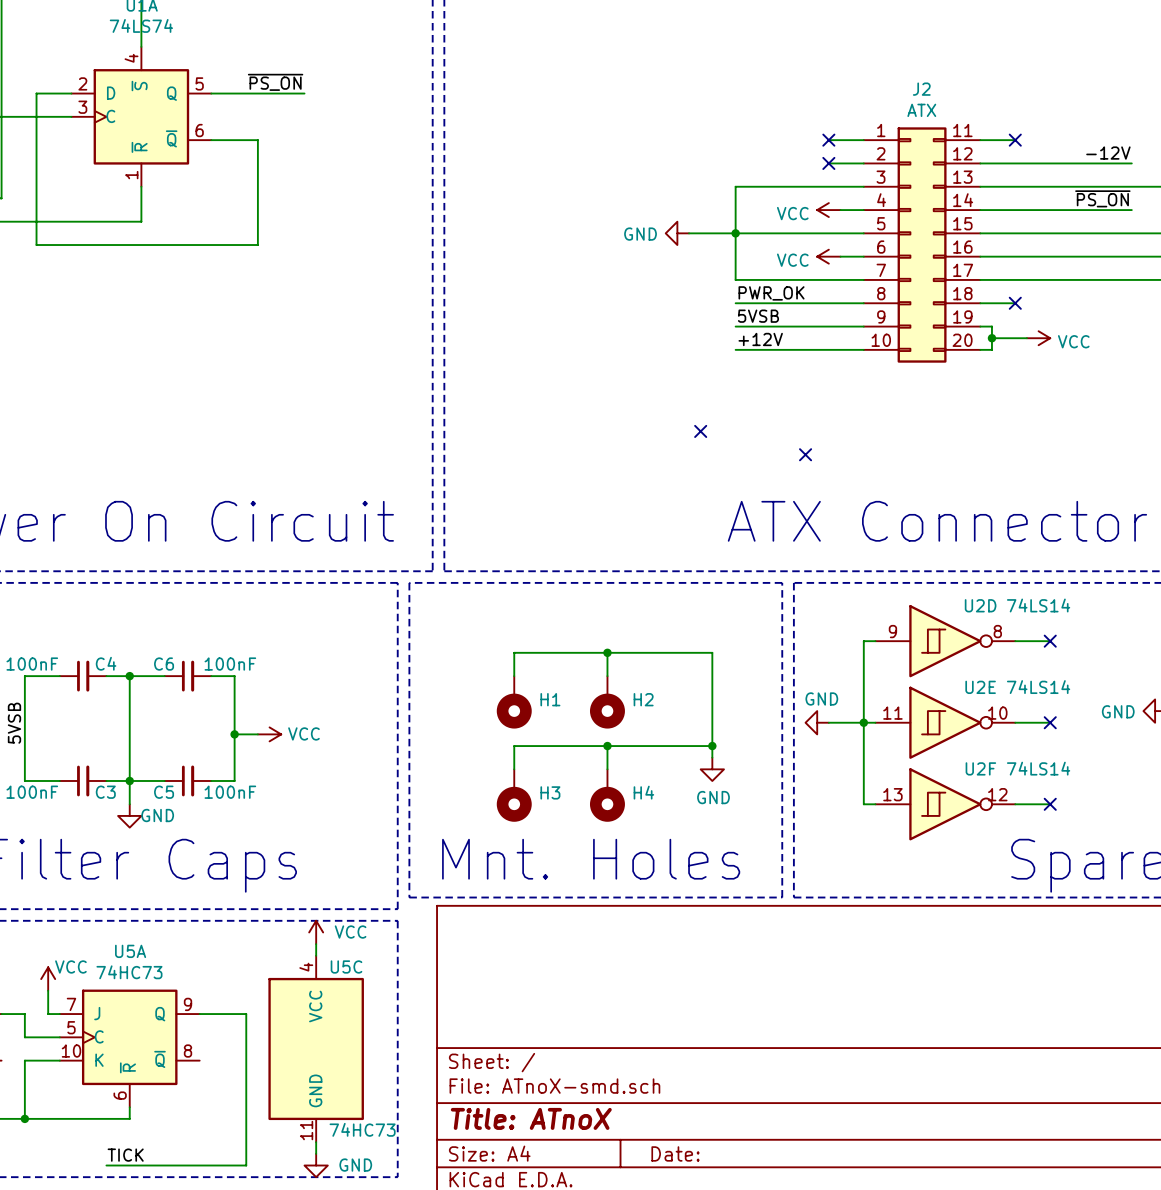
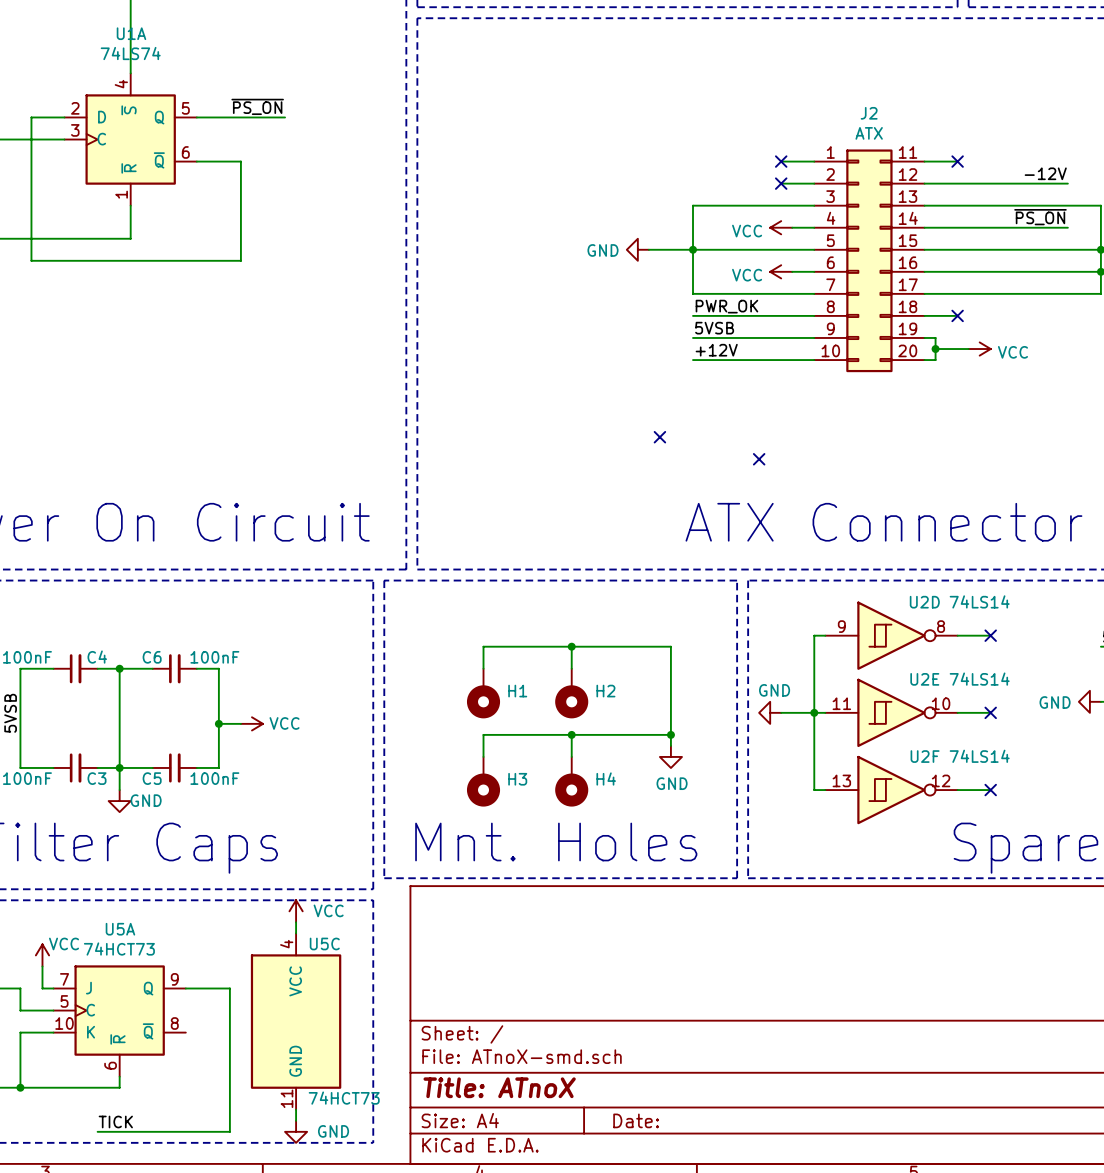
U5A value: 74HC73 (129, 972) -> 74HCT73 (119, 949)
U5C value: 74HC73 (362, 1129) -> 74HCT73 (344, 1098)

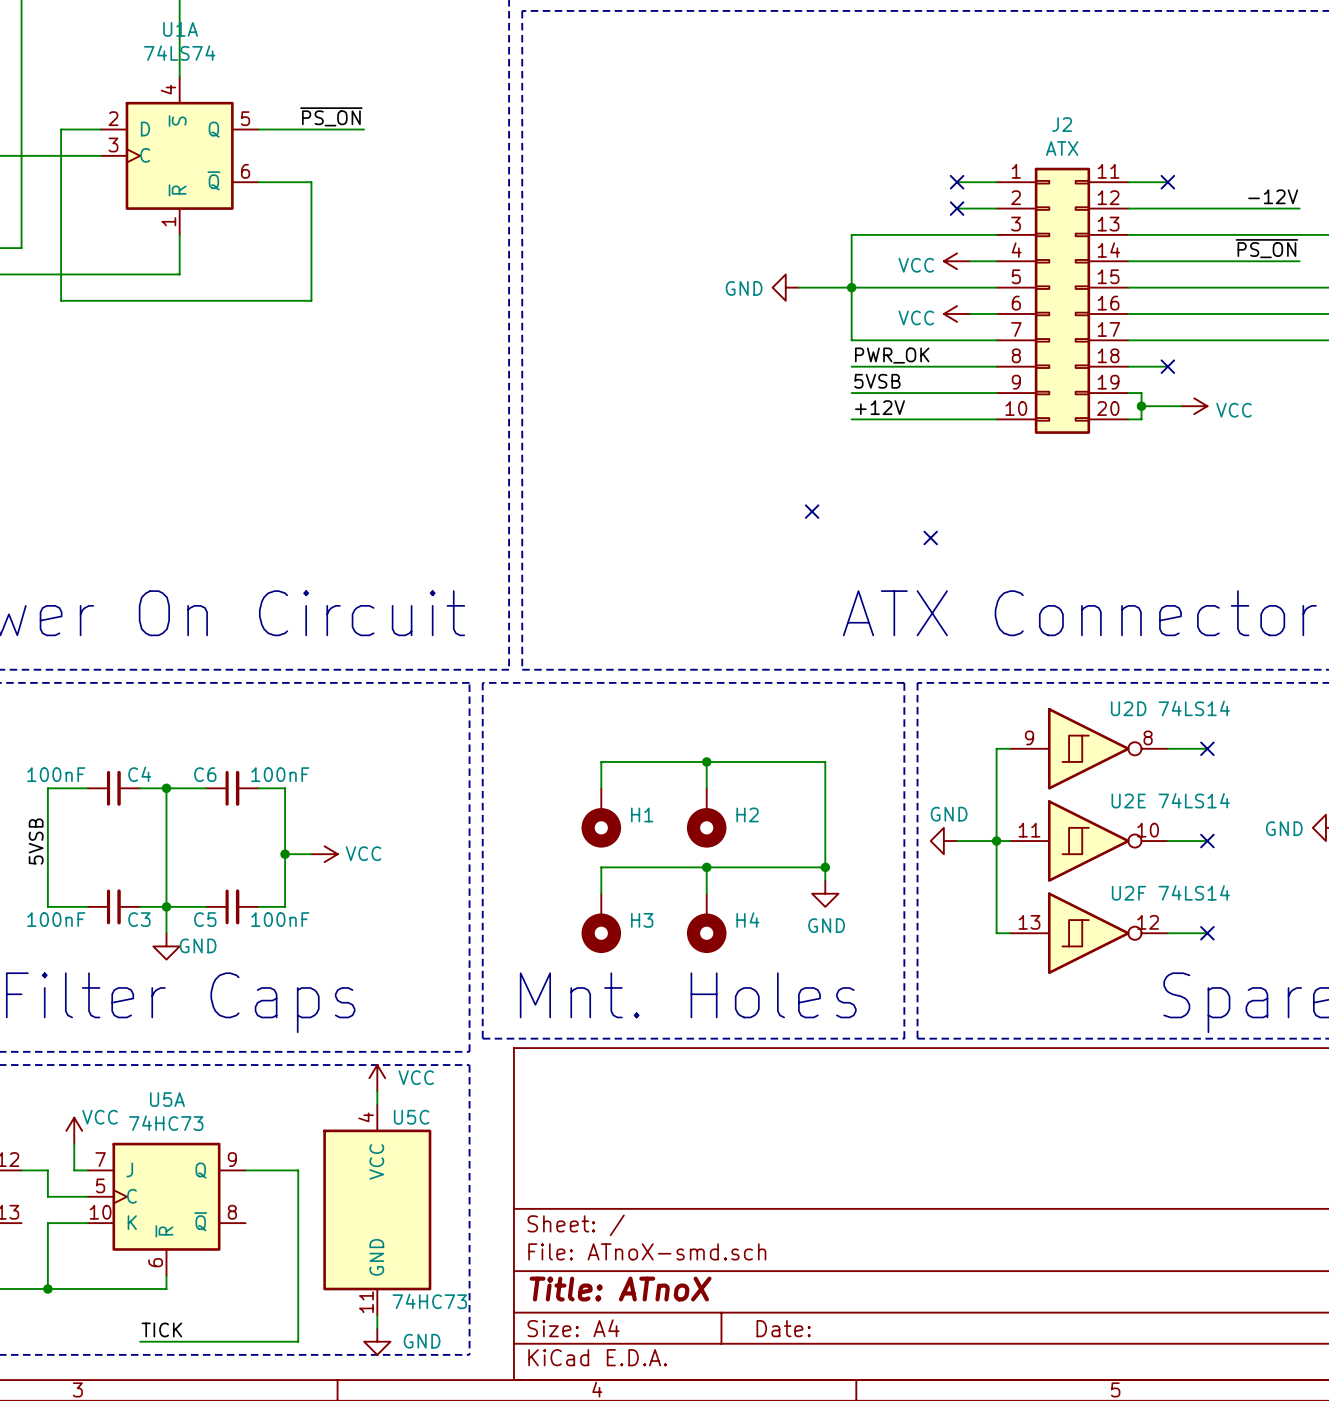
U5A value: 74HCT73 (119, 949) -> 74HC73 (166, 1123)
U5C value: 74HCT73 (344, 1098) -> 74HC73 (429, 1301)

